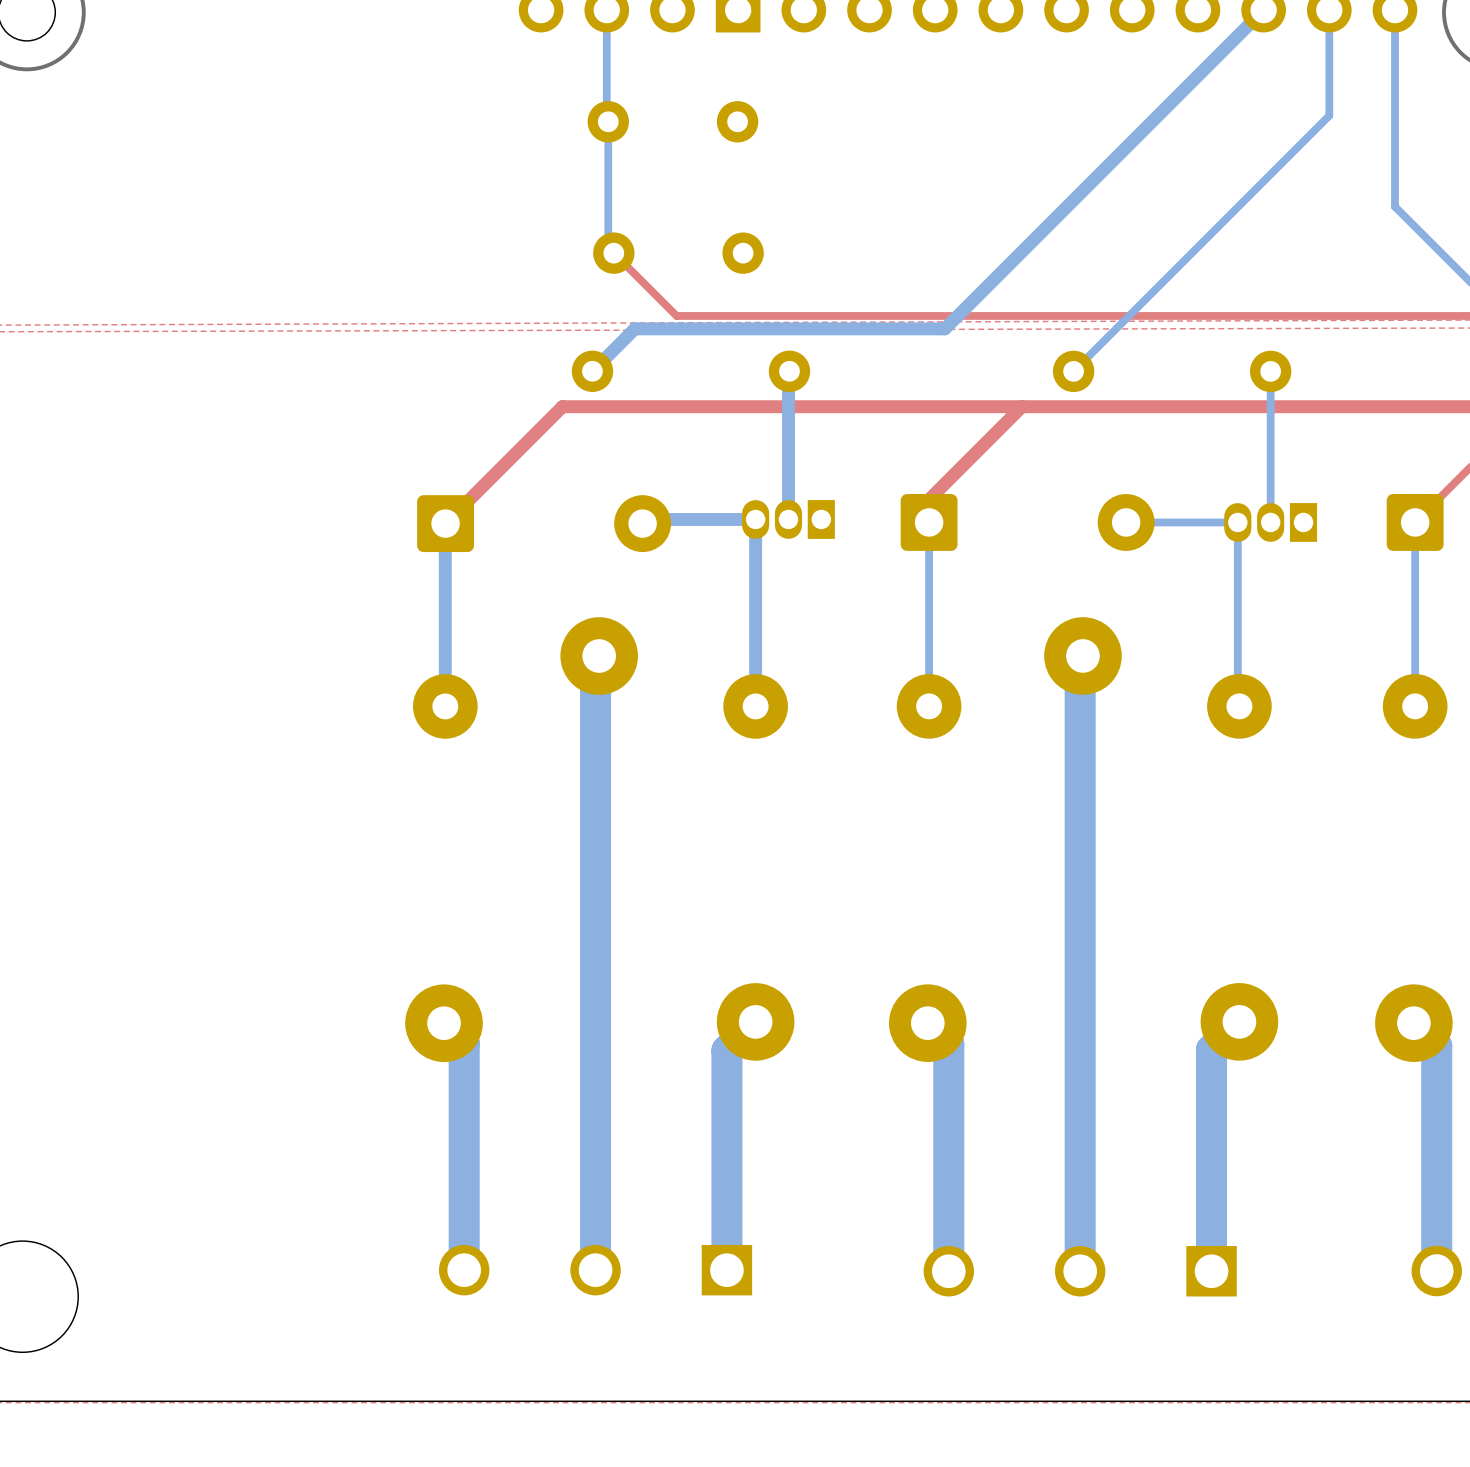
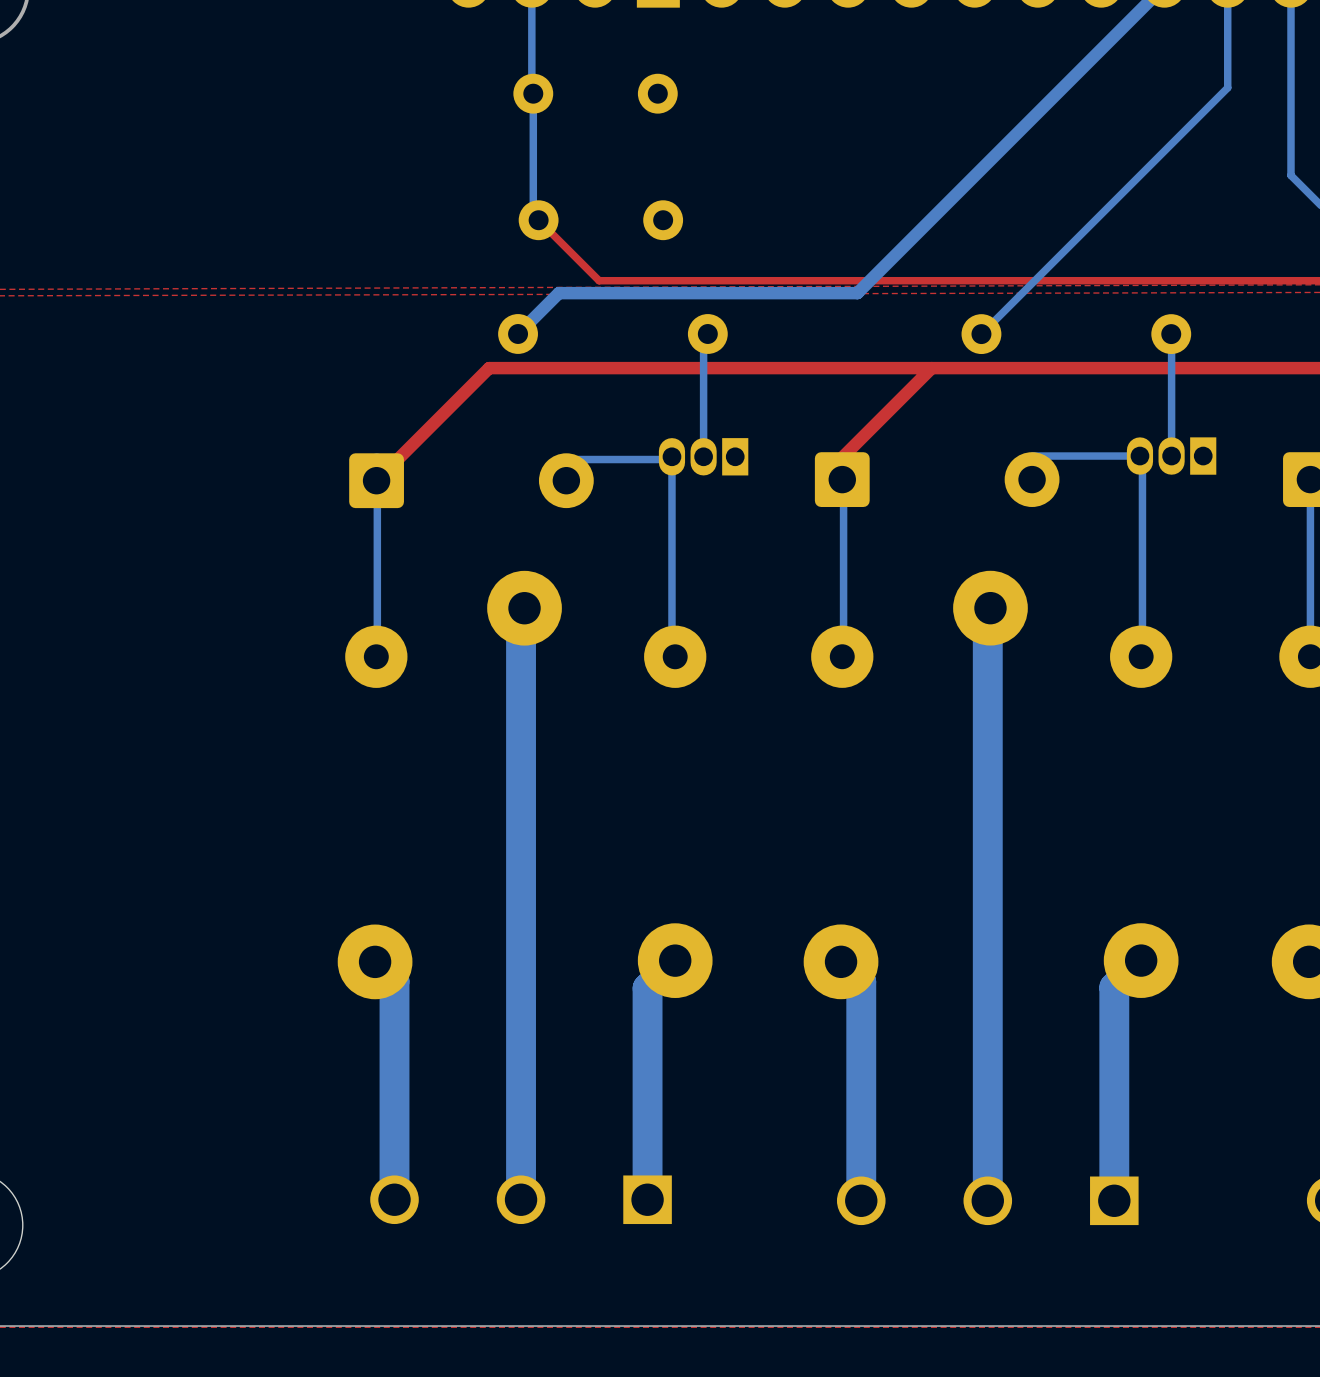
bottom track: (1270, 371) (1270, 522) -> (1171, 334) (1171, 456)
bottom track: (788, 372) (788, 519) -> (706, 334) (703, 338) (703, 456)
bottom track: none -> (842, 456) (843, 641)
bottom track: none -> (1032, 456) (1139, 456) (1142, 458) (1142, 641) (1141, 652) (1139, 655)
bottom track: none -> (376, 459) (377, 640)
bottom track: none -> (566, 459) (669, 459) (671, 456) (671, 635) (676, 640)
bottom track: (646, 519) (755, 519) (755, 706) -> none
part position: (788, 519) -> (703, 456)
bottom track: (929, 522) (929, 706) -> none
bottom track: (1126, 522) (1237, 522) (1237, 704) (1239, 706) -> none
part position: (1270, 522) -> (1171, 456)
bottom track: (445, 523) (445, 706) -> none

